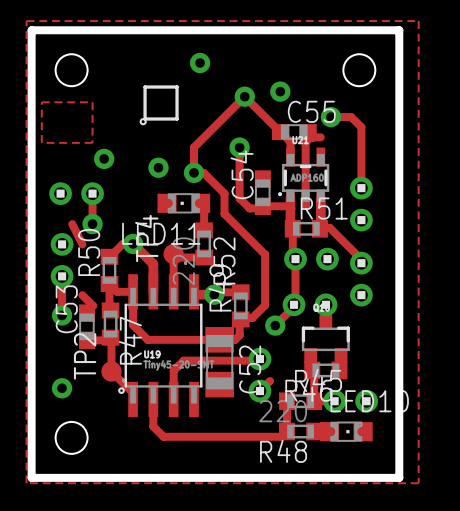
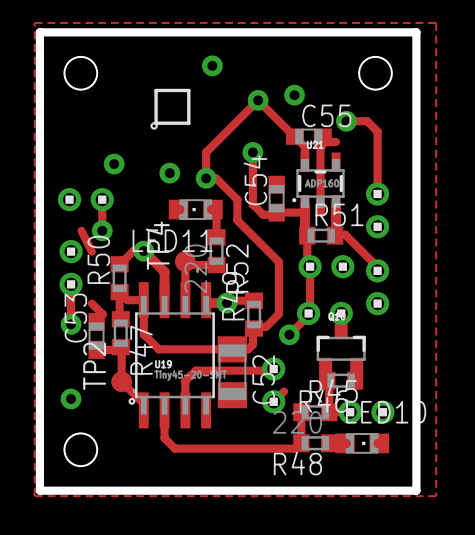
zone outline: (41, 102) (92, 102) (92, 142) (41, 142) (41, 102) -> none

